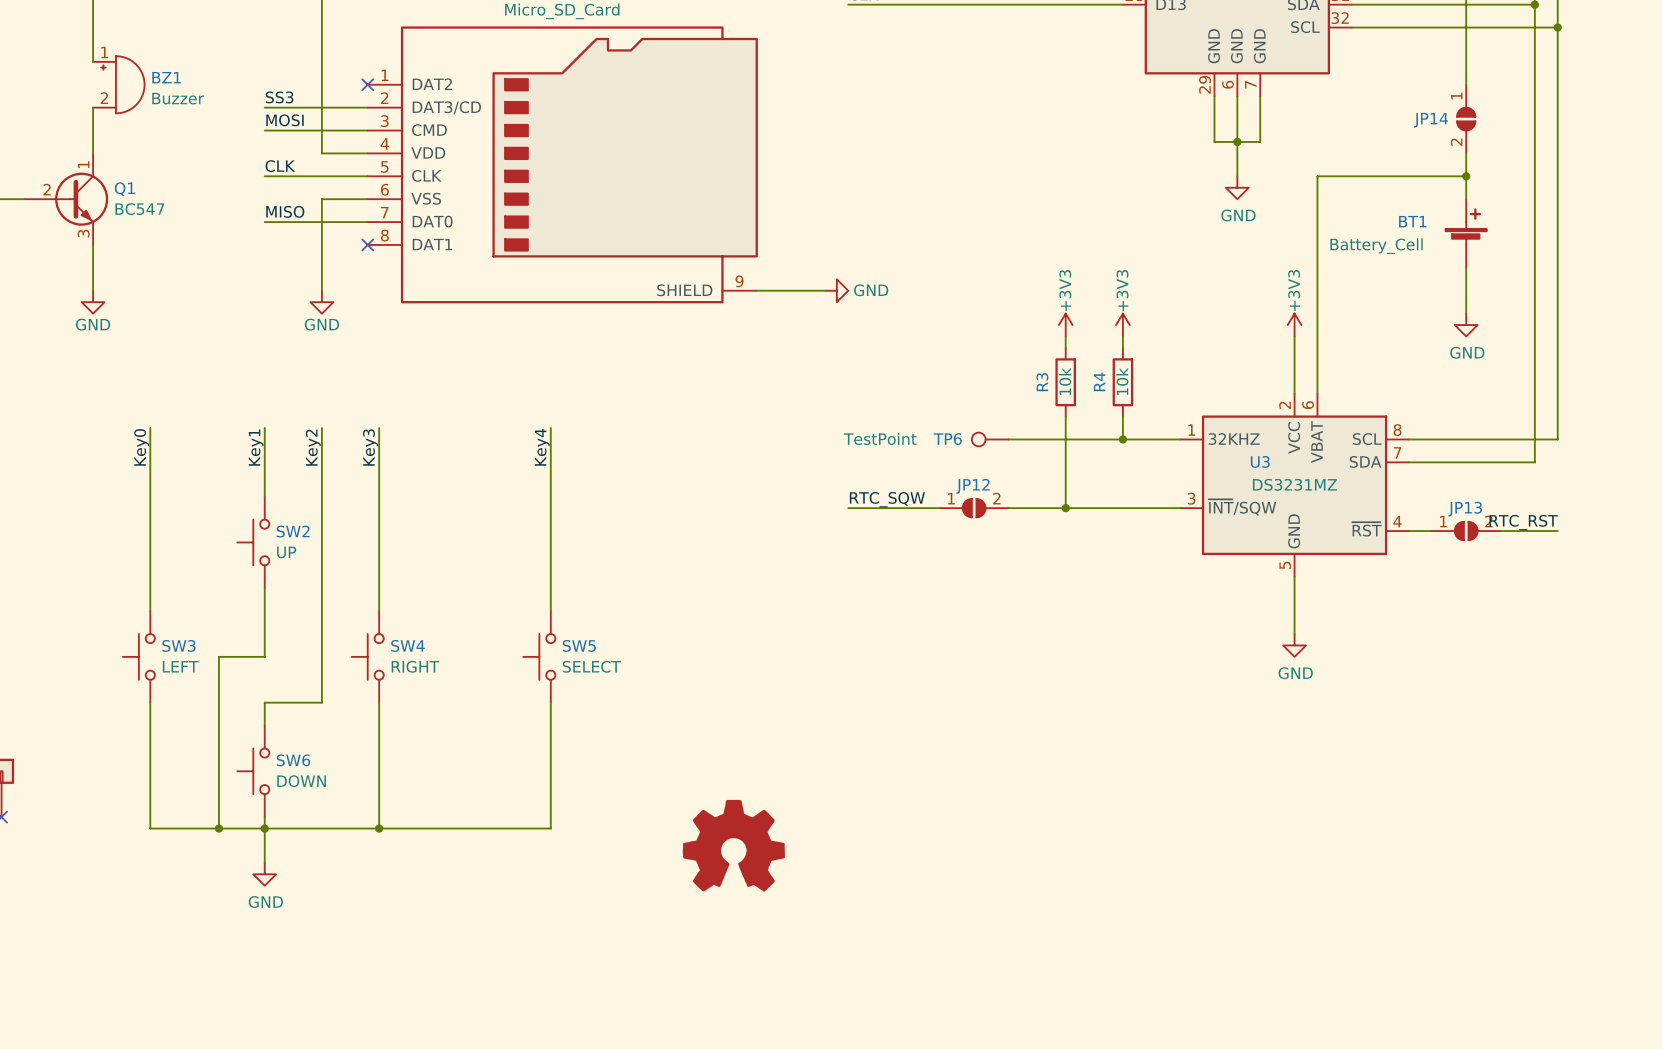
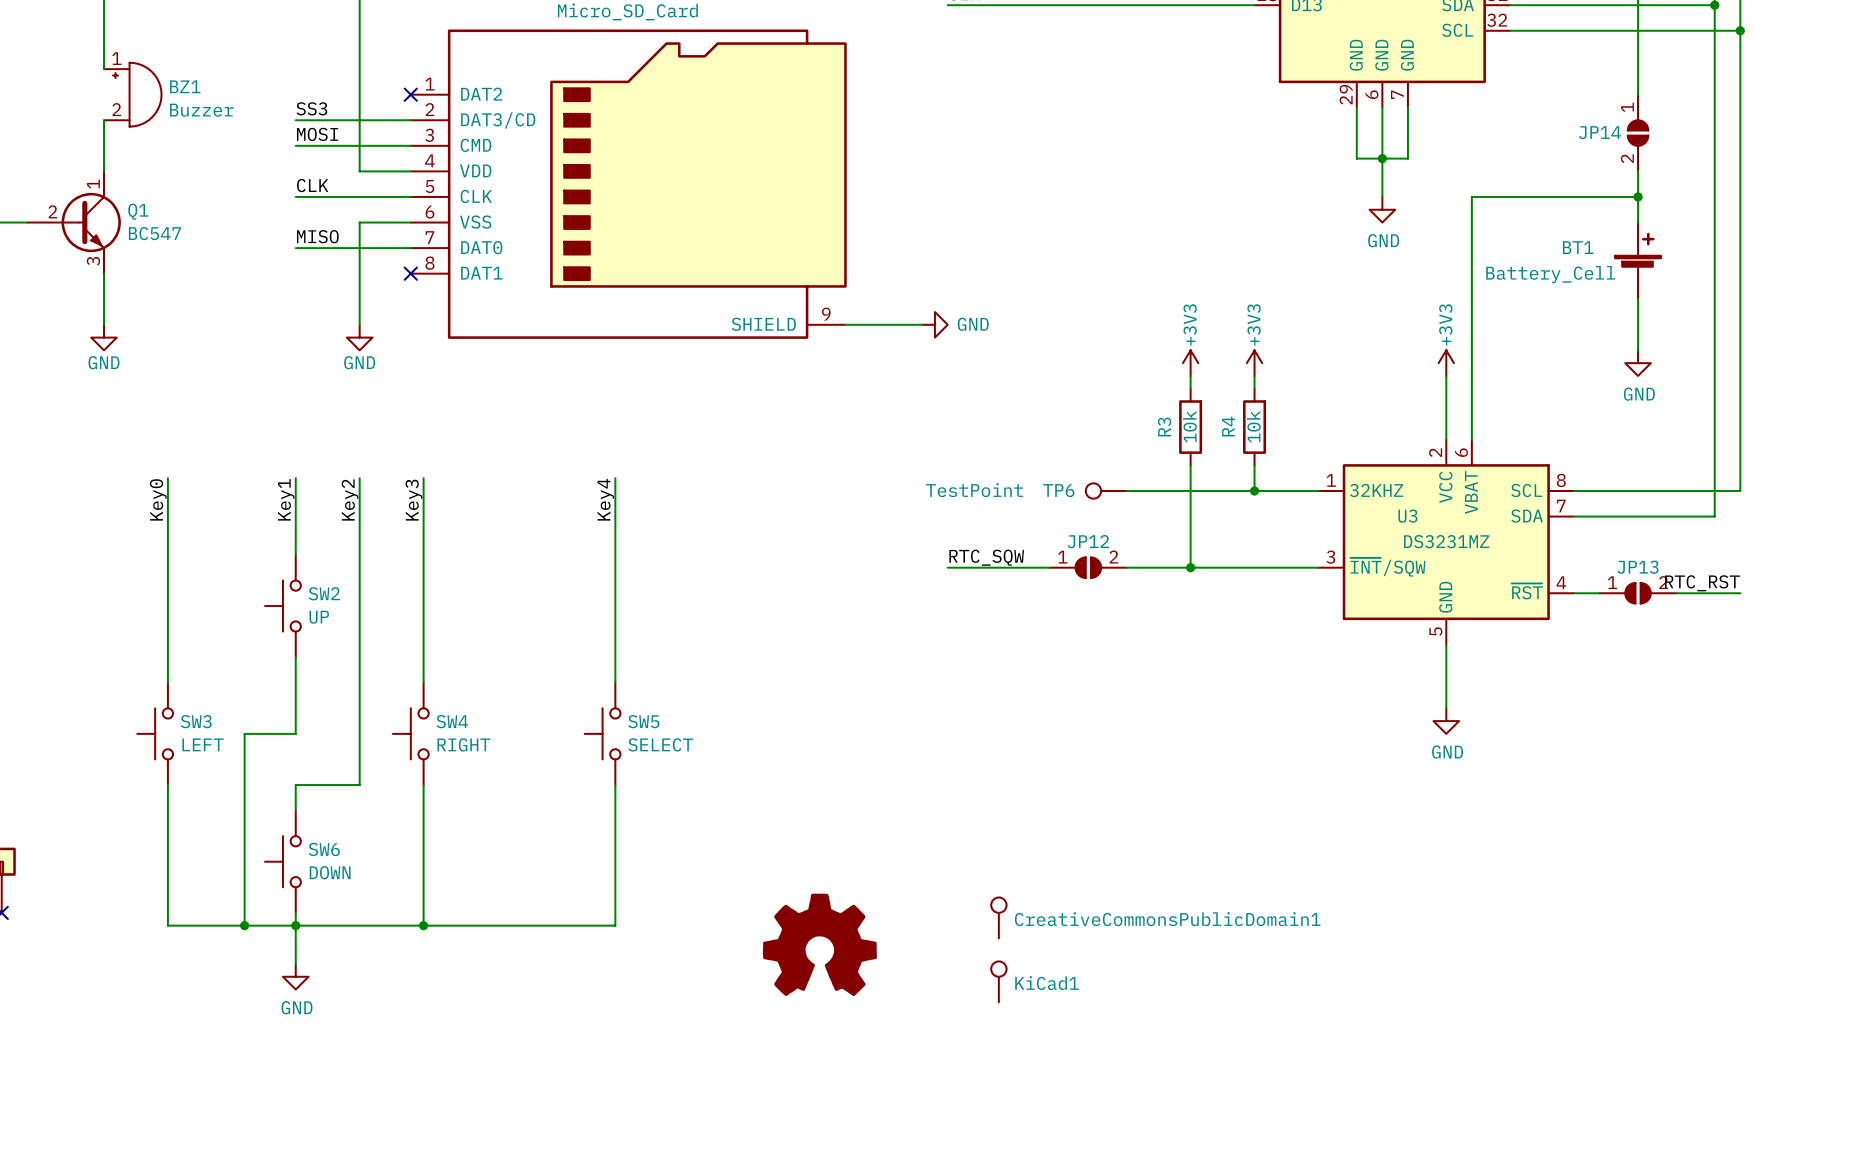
CreativeCommonsPublicDomain1: none -> (998, 917)
KiCad1: none -> (998, 981)

